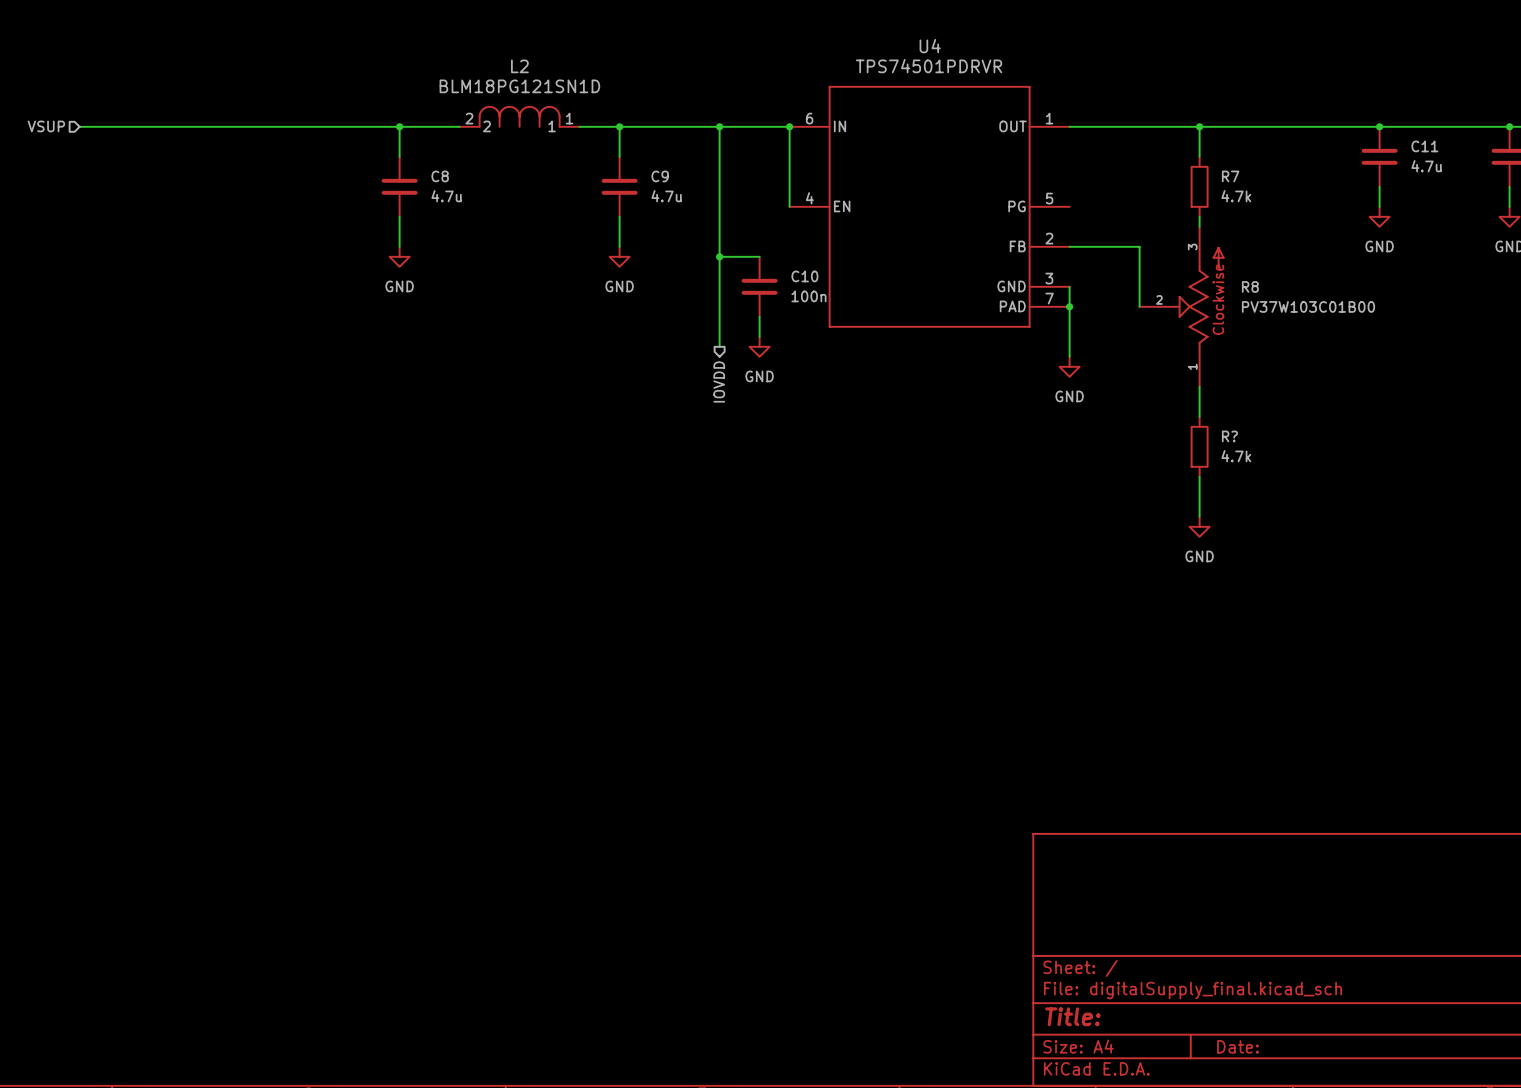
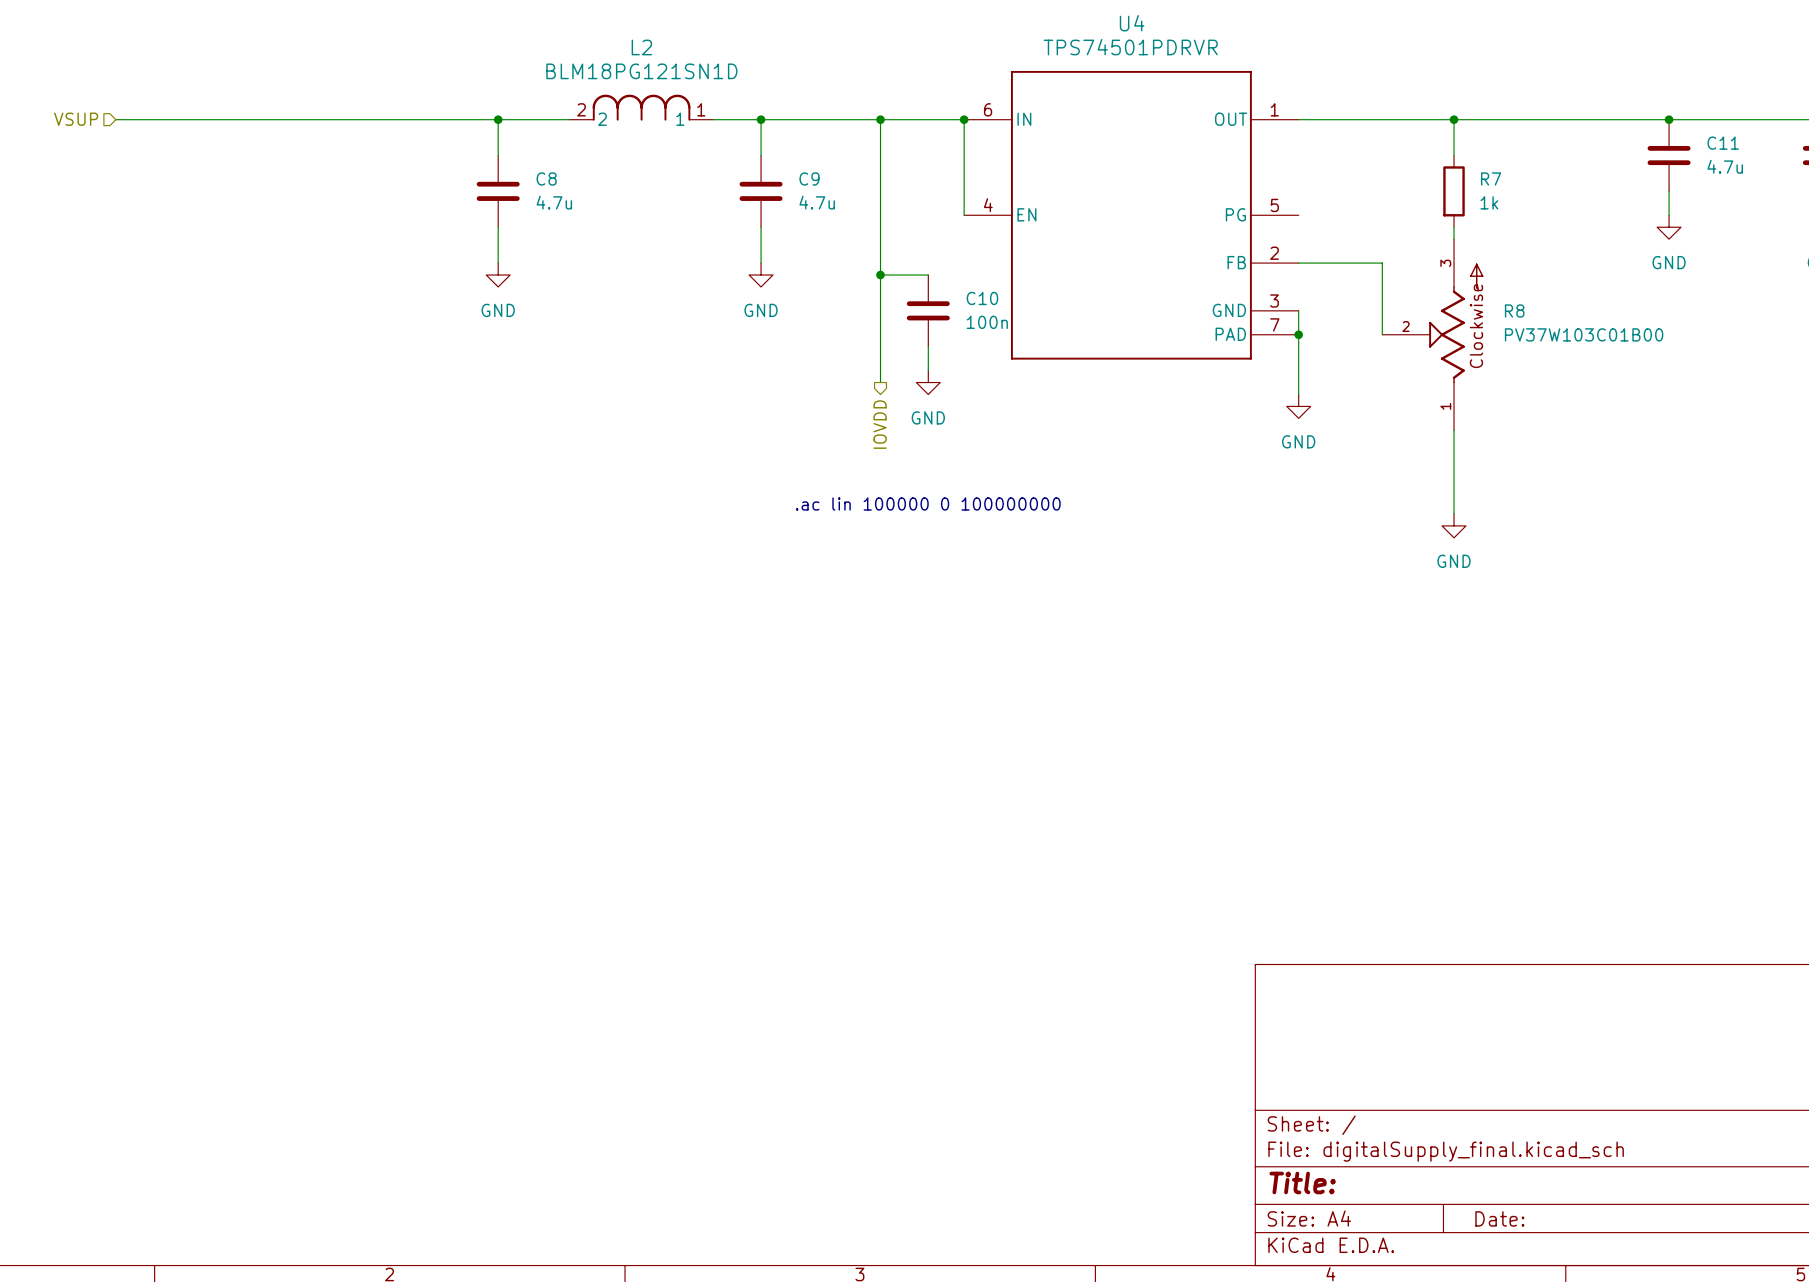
R7 value: 4.7k (1236, 196) -> 1k (1489, 202)
R?: 4.7k (1199, 446) -> none
text: none -> .ac lin 100000 0 100000000 (928, 504)
wire: (1199, 476) (1199, 516) -> (1454, 466) (1454, 513)
power symbol position: GND (1199, 526) -> GND (1454, 525)

